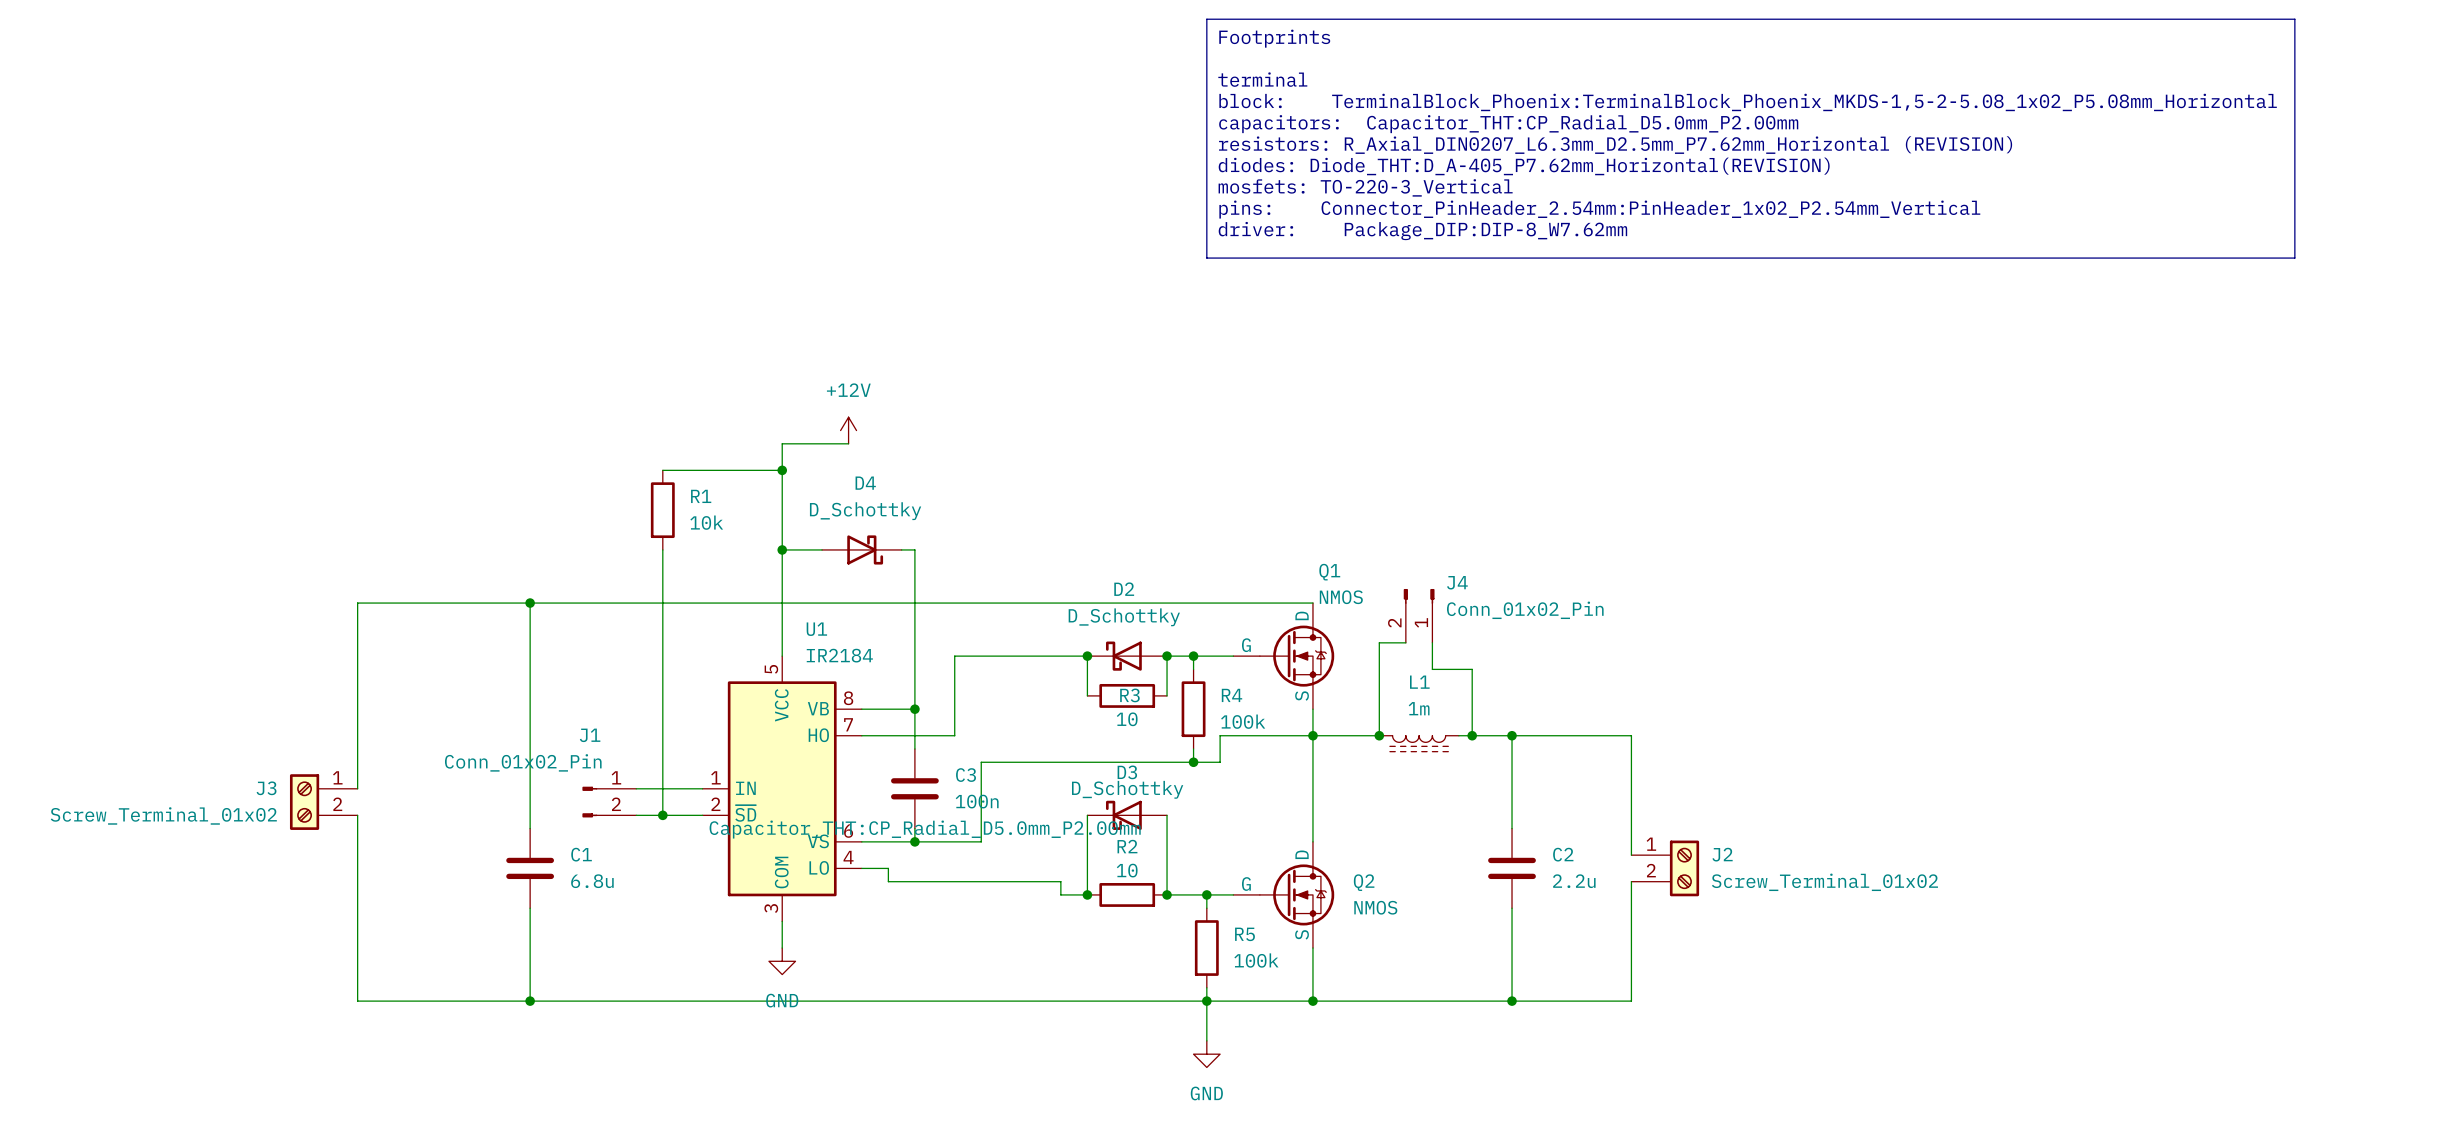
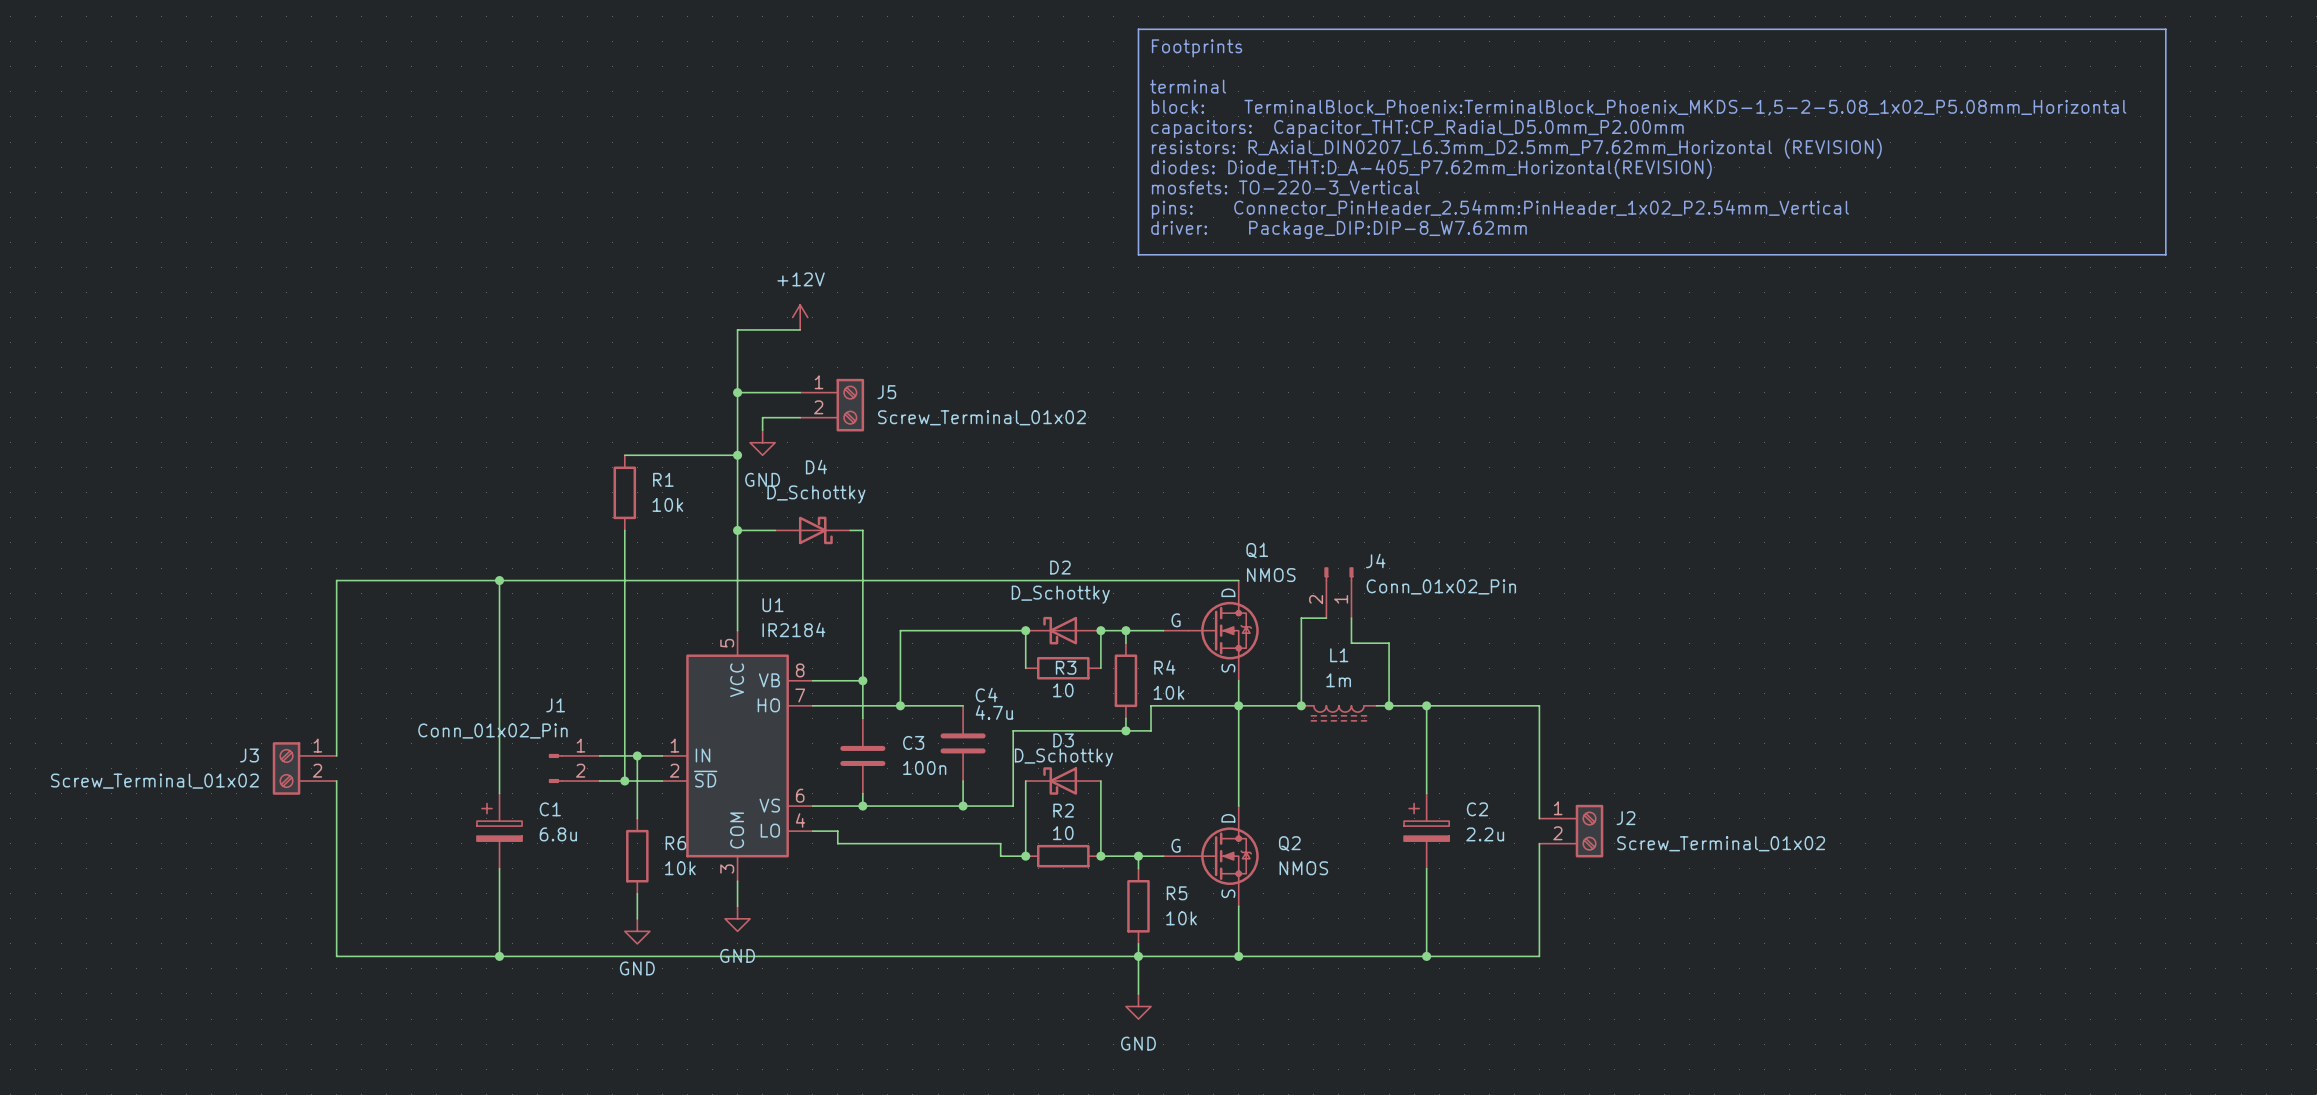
wire: none -> (737, 392) (800, 392)
junction: none -> (737, 392)
J5: none -> Screw_Terminal_01x02 (832, 405)
wire: none -> (800, 417) (762, 417) (762, 430)
power symbol position: +12V (848, 430) -> +12V (800, 317)
wire: (782, 443) (848, 443) -> (737, 430) (737, 329) (800, 329)
power symbol: none -> GND (762, 442)
R4 value: 100k (1243, 721) -> 10k (1169, 692)
wire: none -> (900, 705) (963, 705)
junction: none -> (900, 705)
wire: (1074, 762) (981, 762) (981, 841) -> (1013, 730) (1013, 806) (925, 806)
C4: none -> 4.7u (963, 743)
wire: none -> (637, 755) (637, 818)
junction: none -> (637, 755)
wire: none -> (963, 781) (963, 806)
C1 symbol: [506, 828, 555, 909] -> [476, 793, 523, 869]
C2 symbol: [1488, 828, 1536, 909] -> [1404, 793, 1450, 869]
C3 text: Capacitor_THT:CP_Radial_D5.0mm_P2.00mm (925, 829) -> none
junction: none -> (963, 806)
R6: none -> 10k (637, 856)
wire: none -> (637, 893) (637, 918)
R5 value: 100k (1256, 960) -> 10k (1181, 918)
power symbol: none -> GND (637, 931)

